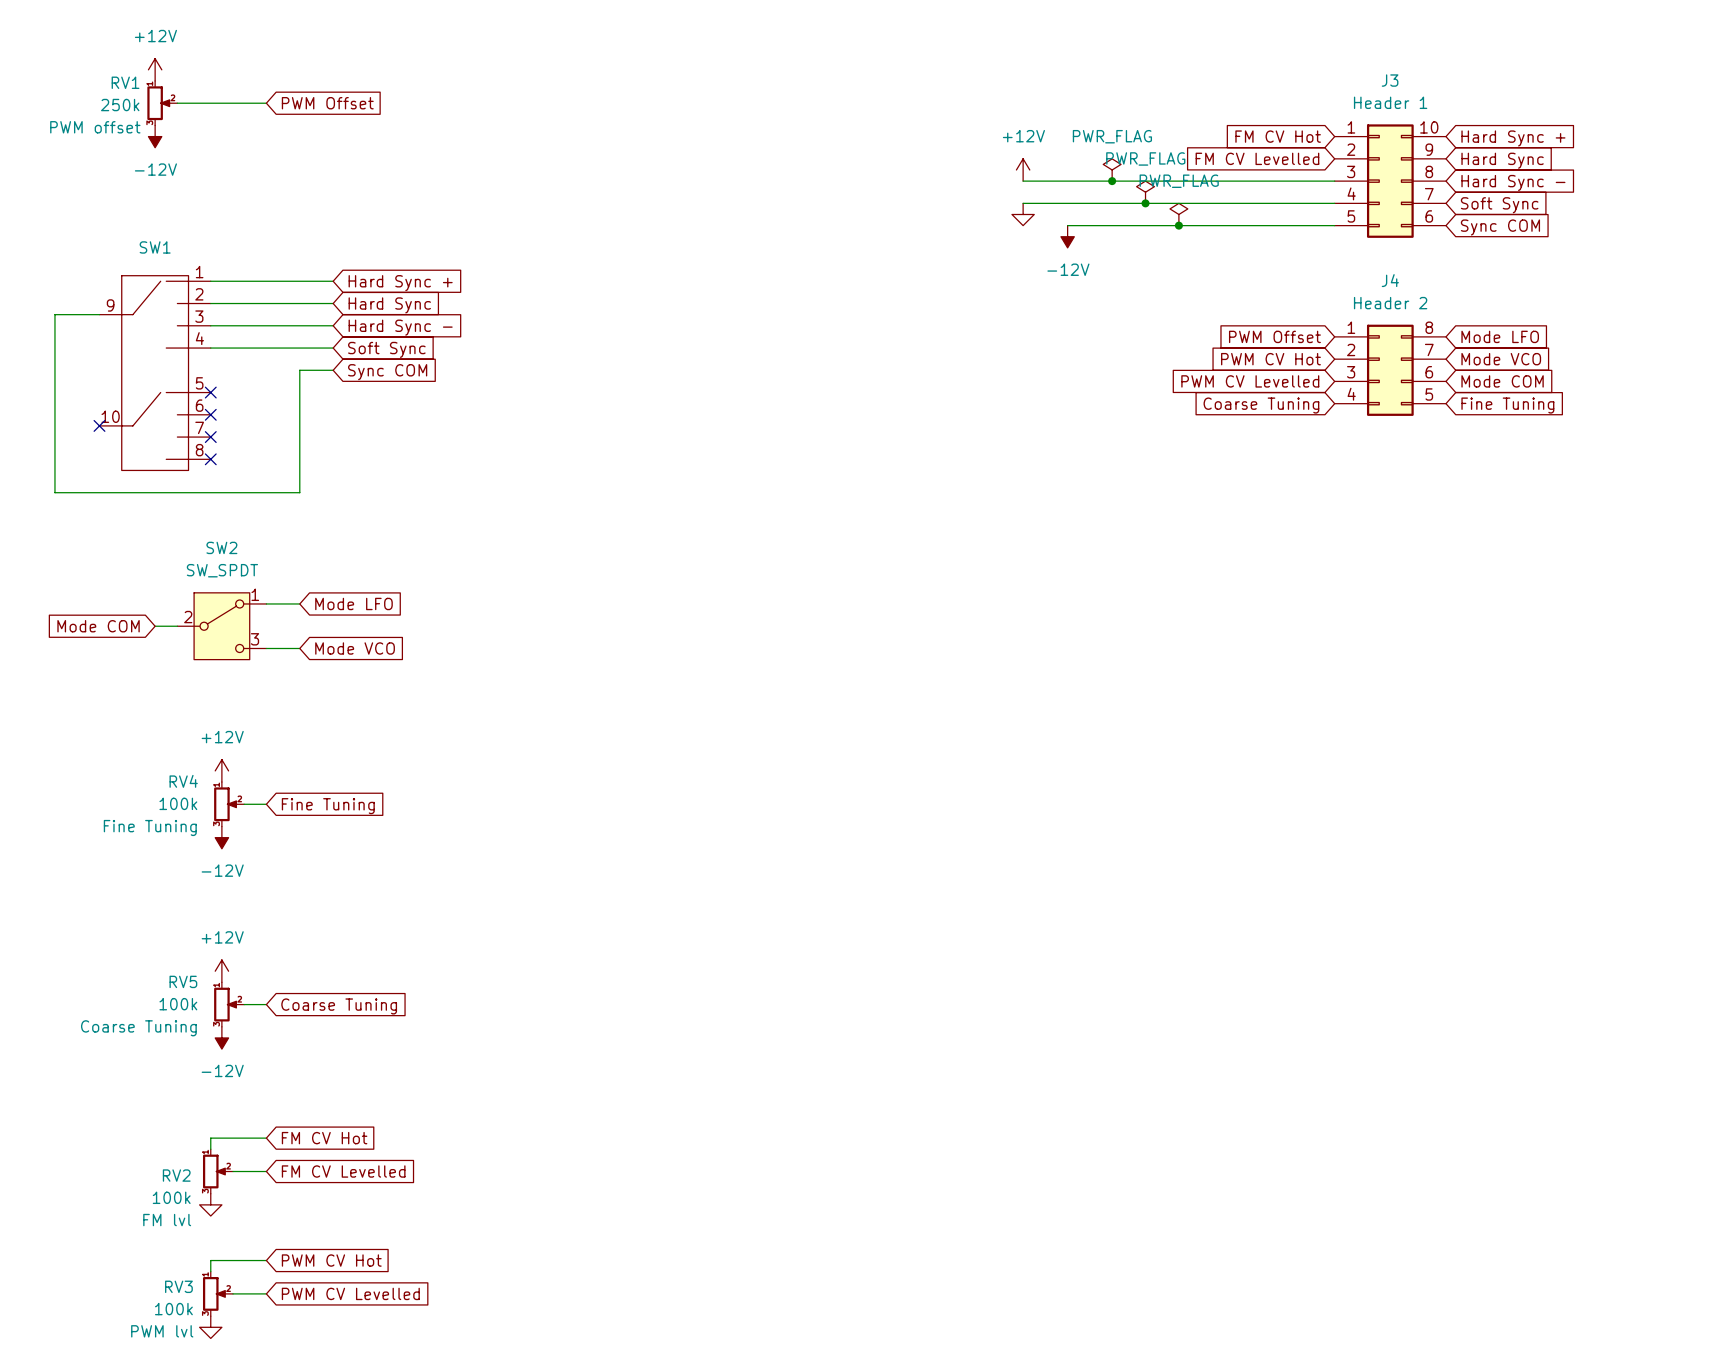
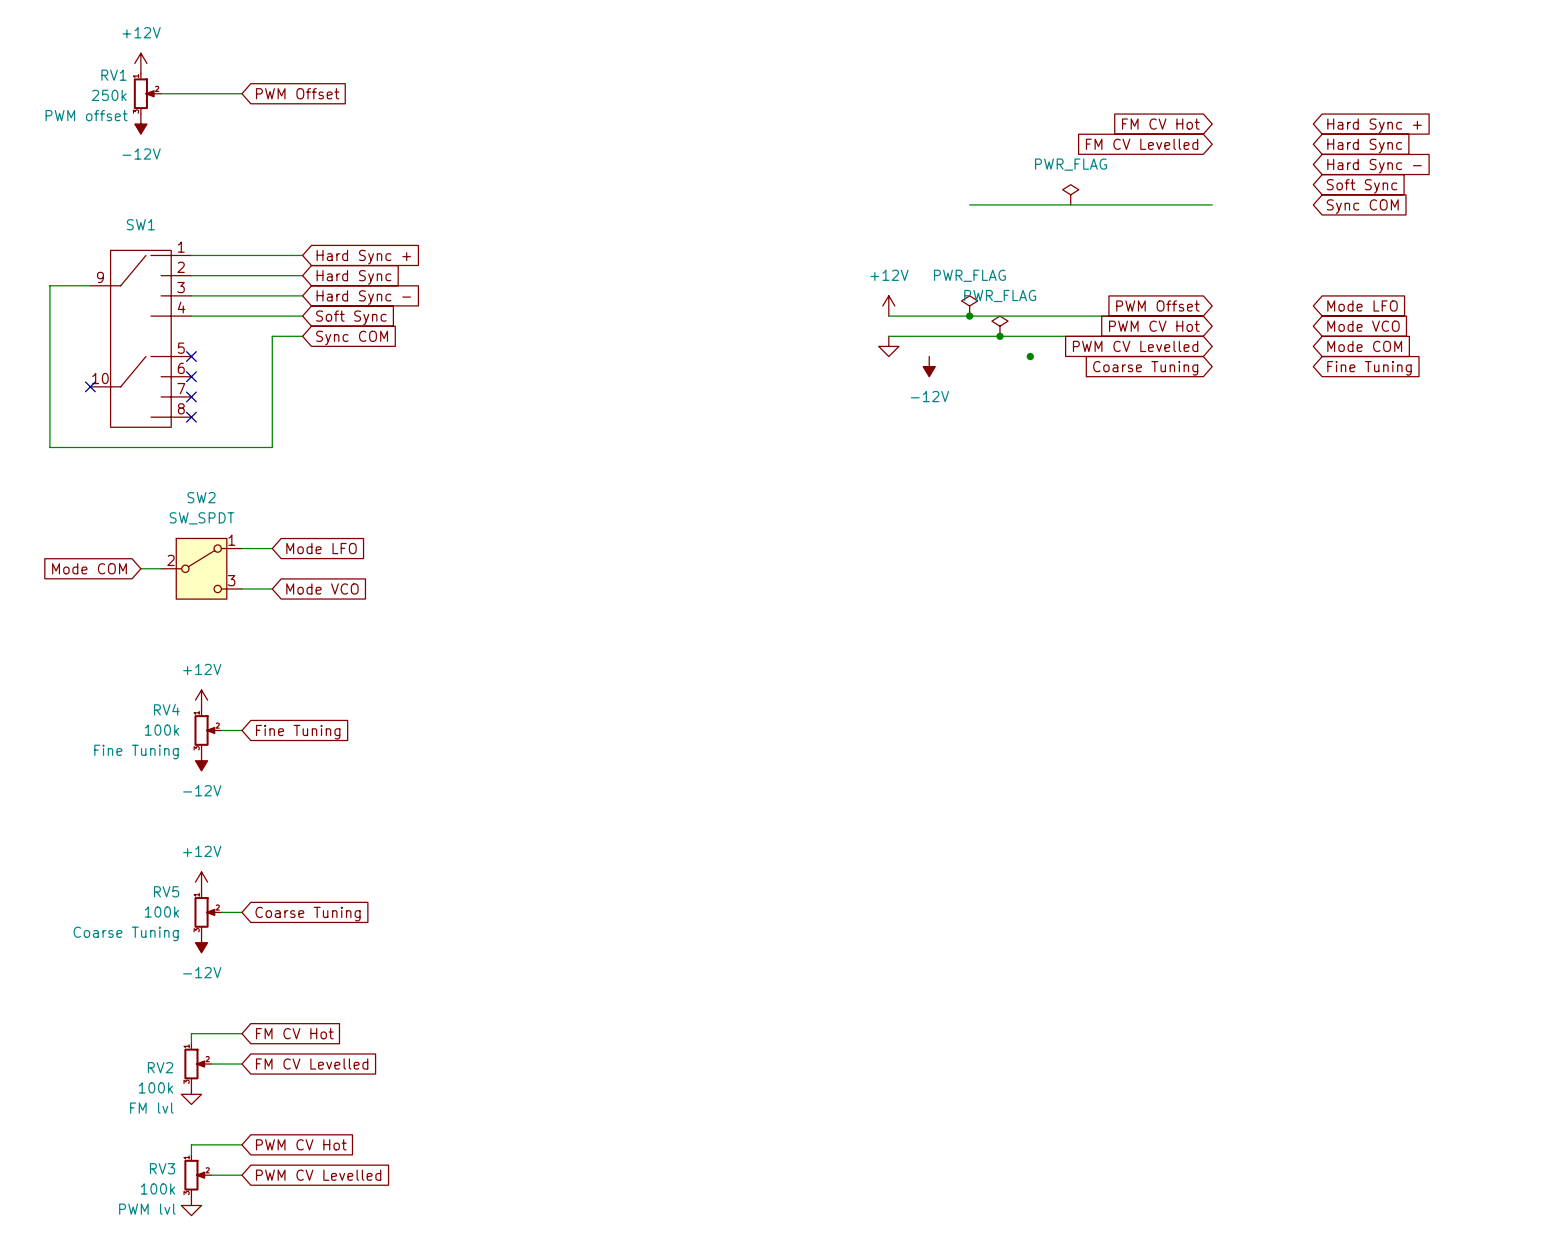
power symbol position: +12V (1023, 169) -> +12V (888, 305)
power symbol: PWR_FLAG (1112, 169) -> none
wire: (1023, 181) (1334, 181) -> (888, 316) (1171, 316)
junction: (1112, 181) -> none
J3: Header 1 (1390, 181) -> none
power symbol: PWR_FLAG (1145, 192) -> none
wire: (1023, 203) (1334, 203) -> (888, 336) (1171, 336)
junction: (1145, 203) -> none
power symbol position: (1023, 214) -> (888, 346)
junction: (1178, 225) -> none
power symbol position: -12V (1067, 236) -> -12V (929, 366)
power symbol: none -> PWR_FLAG (969, 305)
junction: none -> (969, 316)
power symbol: none -> PWR_FLAG (999, 326)
junction: none -> (999, 336)
J4: Header 2 (1390, 370) -> none
junction: none -> (1030, 356)

